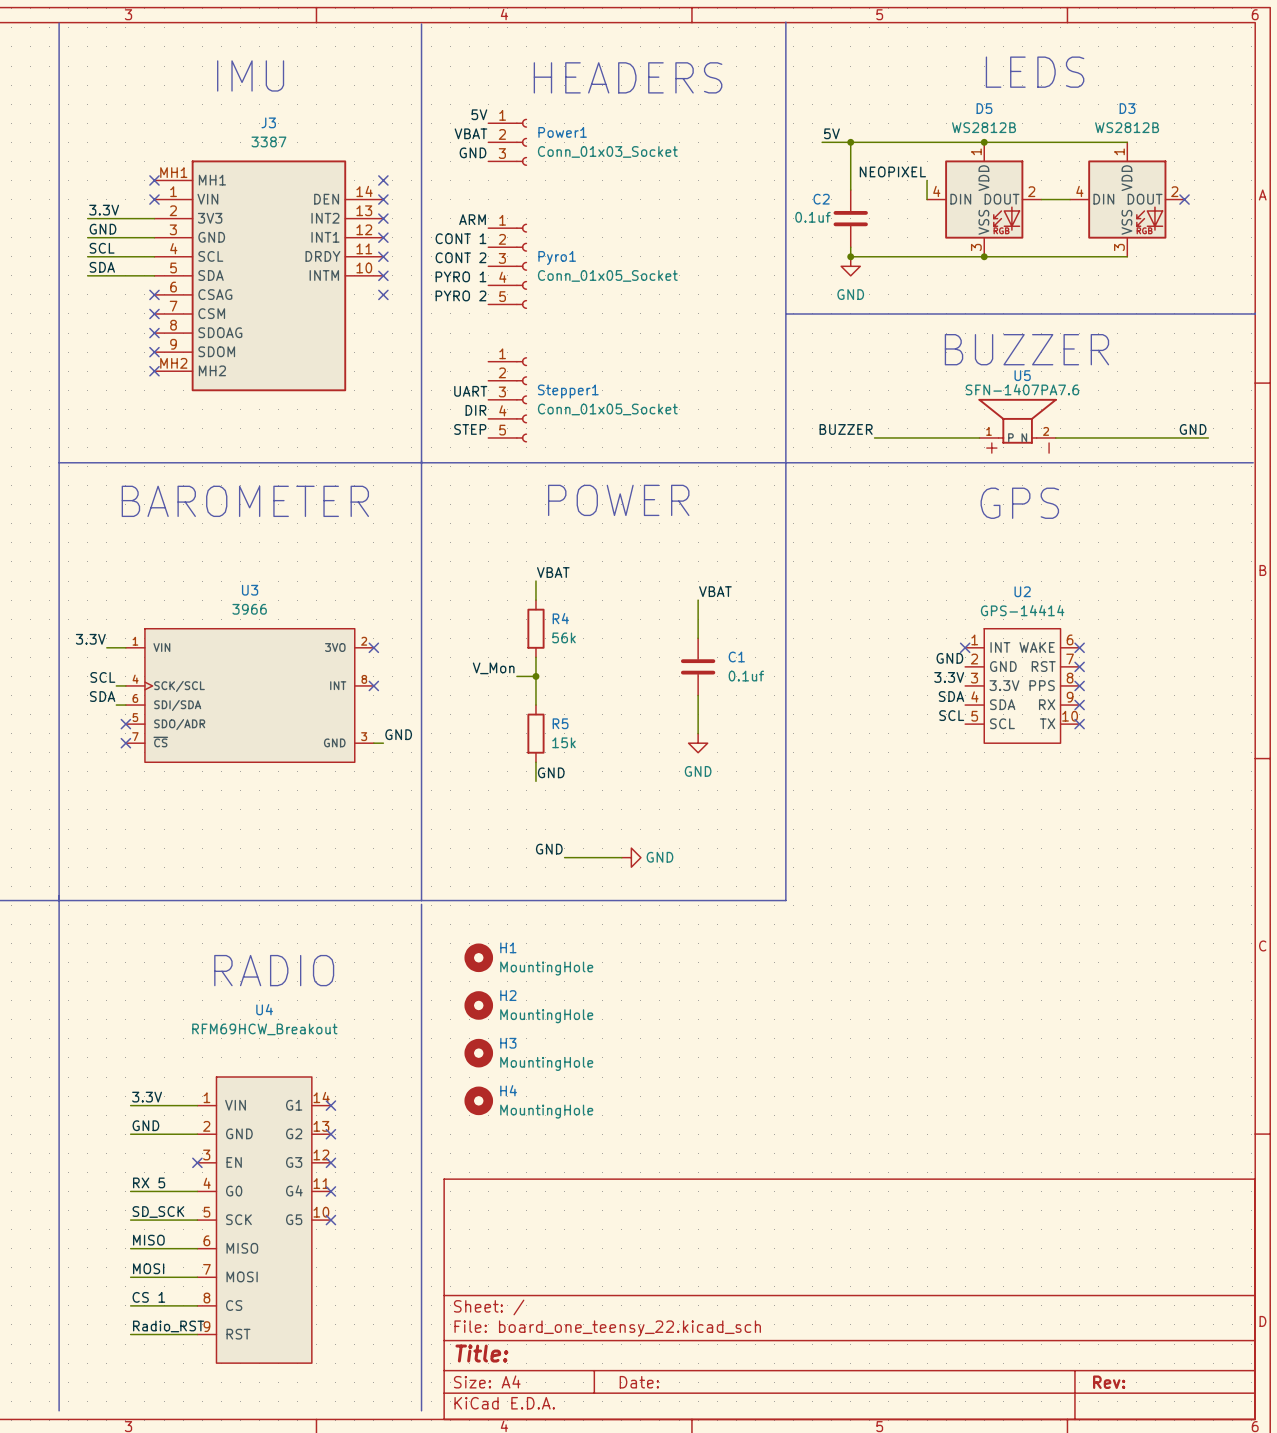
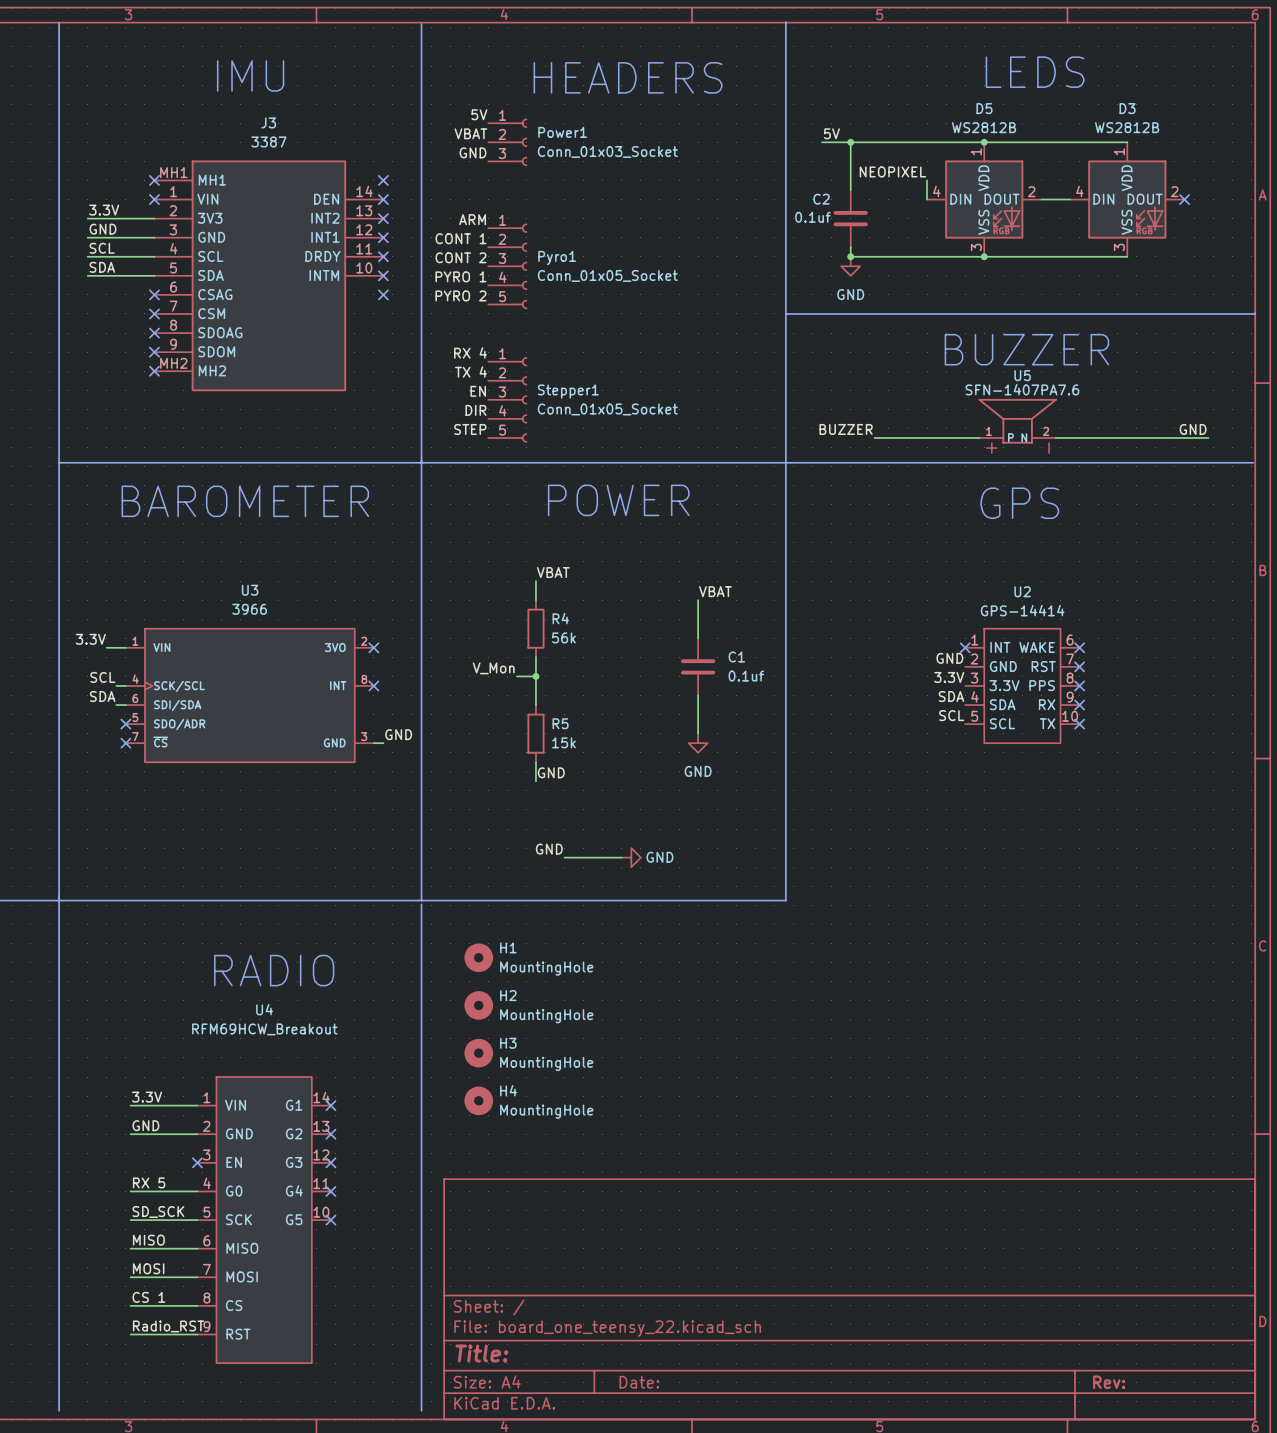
label: none -> RX 4 (470, 352)
label: none -> TX 4 (470, 372)
label: UART (470, 391) -> EN (478, 391)

